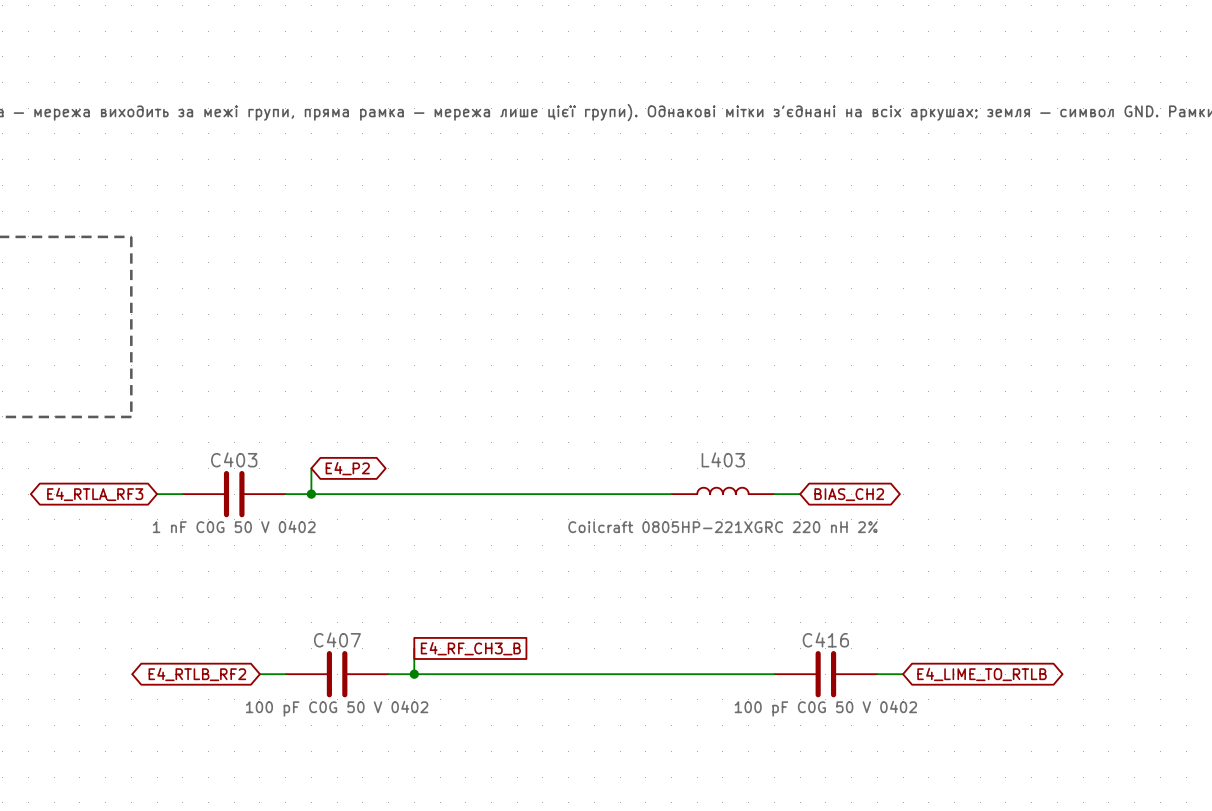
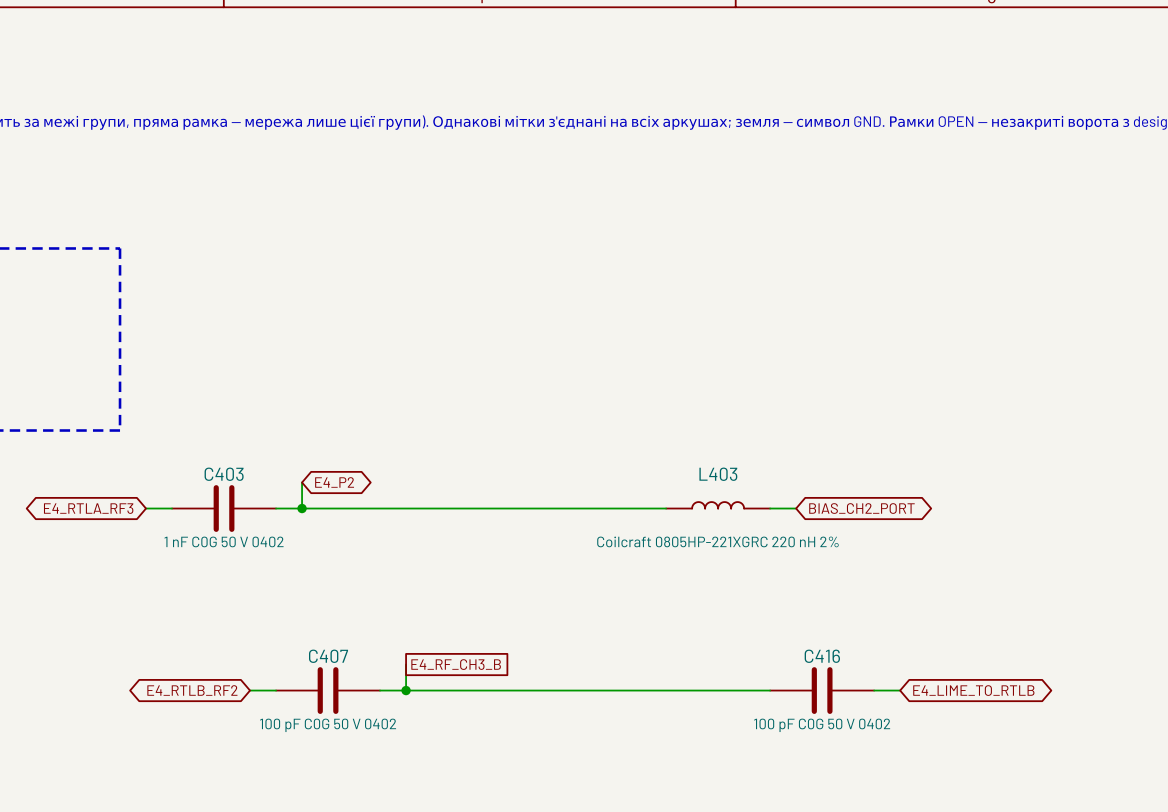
global label: BIAS_CH2 (849, 494) -> BIAS_CH2_PORT (861, 508)

